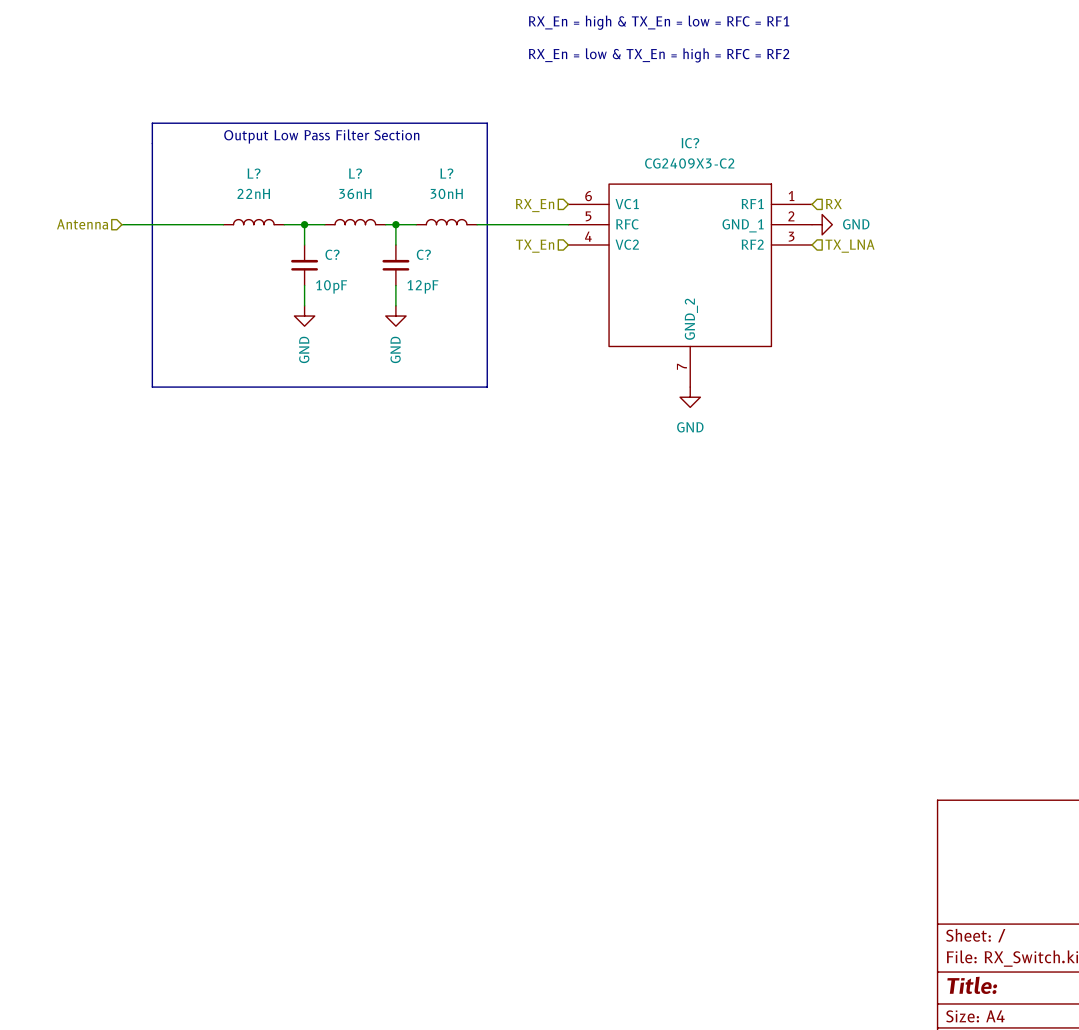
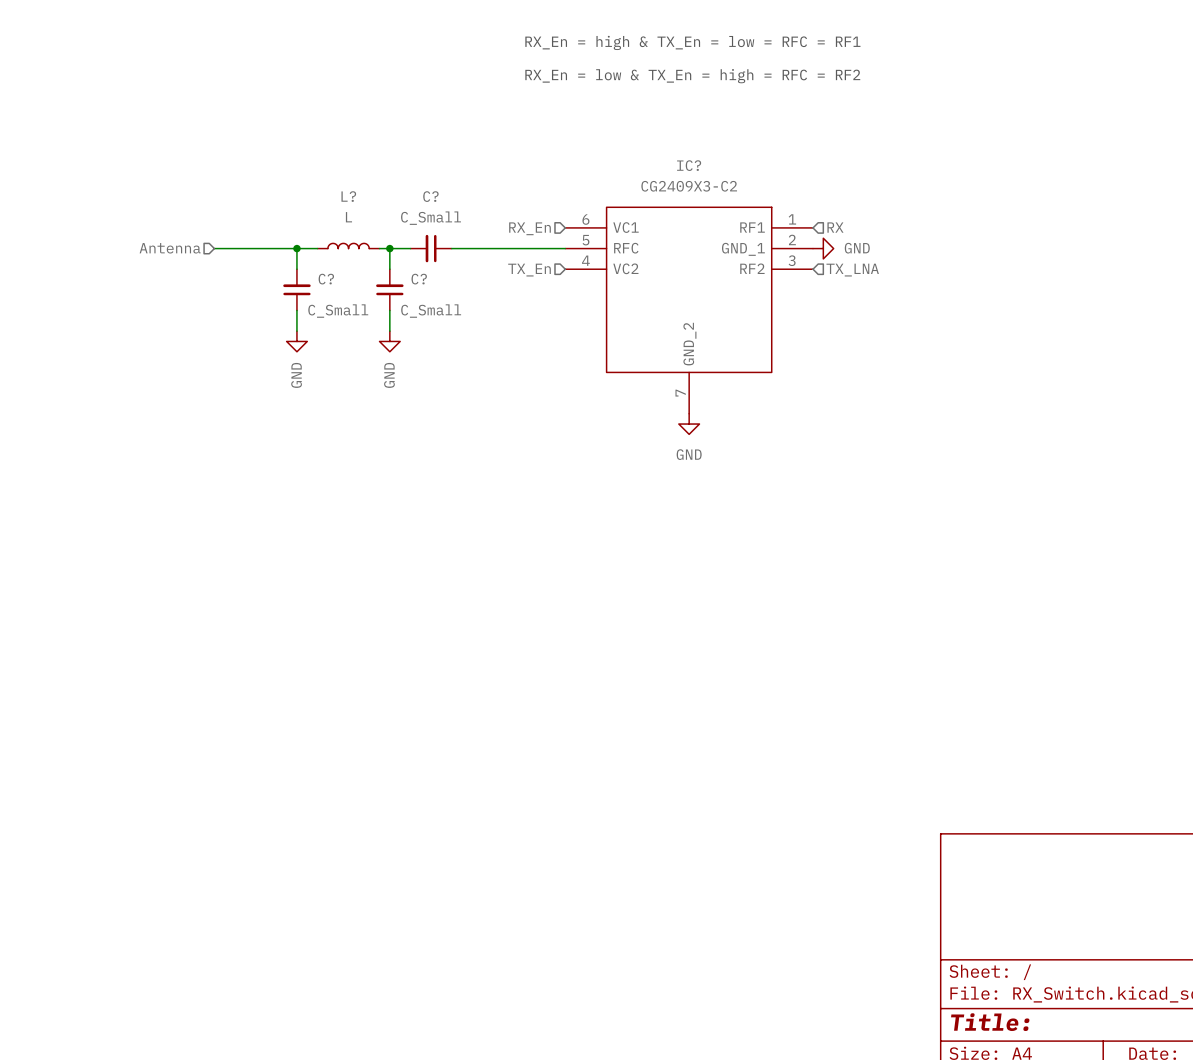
line: (152, 123) (487, 123) (487, 387) (152, 387) (152, 123) -> none
text: Output Low Pass Filter Section (321, 136) -> none
L? value: 36nH (355, 193) -> L (348, 217)
L?: 22nH (253, 222) -> none
L?: 30nH (446, 222) -> none
hierarchical label position: Antenna (82, 224) -> Antenna (170, 248)
wire: (121, 224) (223, 224) -> (276, 248) (214, 248)
C?: none -> C_Small (431, 248)
C? value: 10pF (331, 286) -> C_Small (338, 311)
C? value: 12pF (422, 286) -> C_Small (431, 311)

